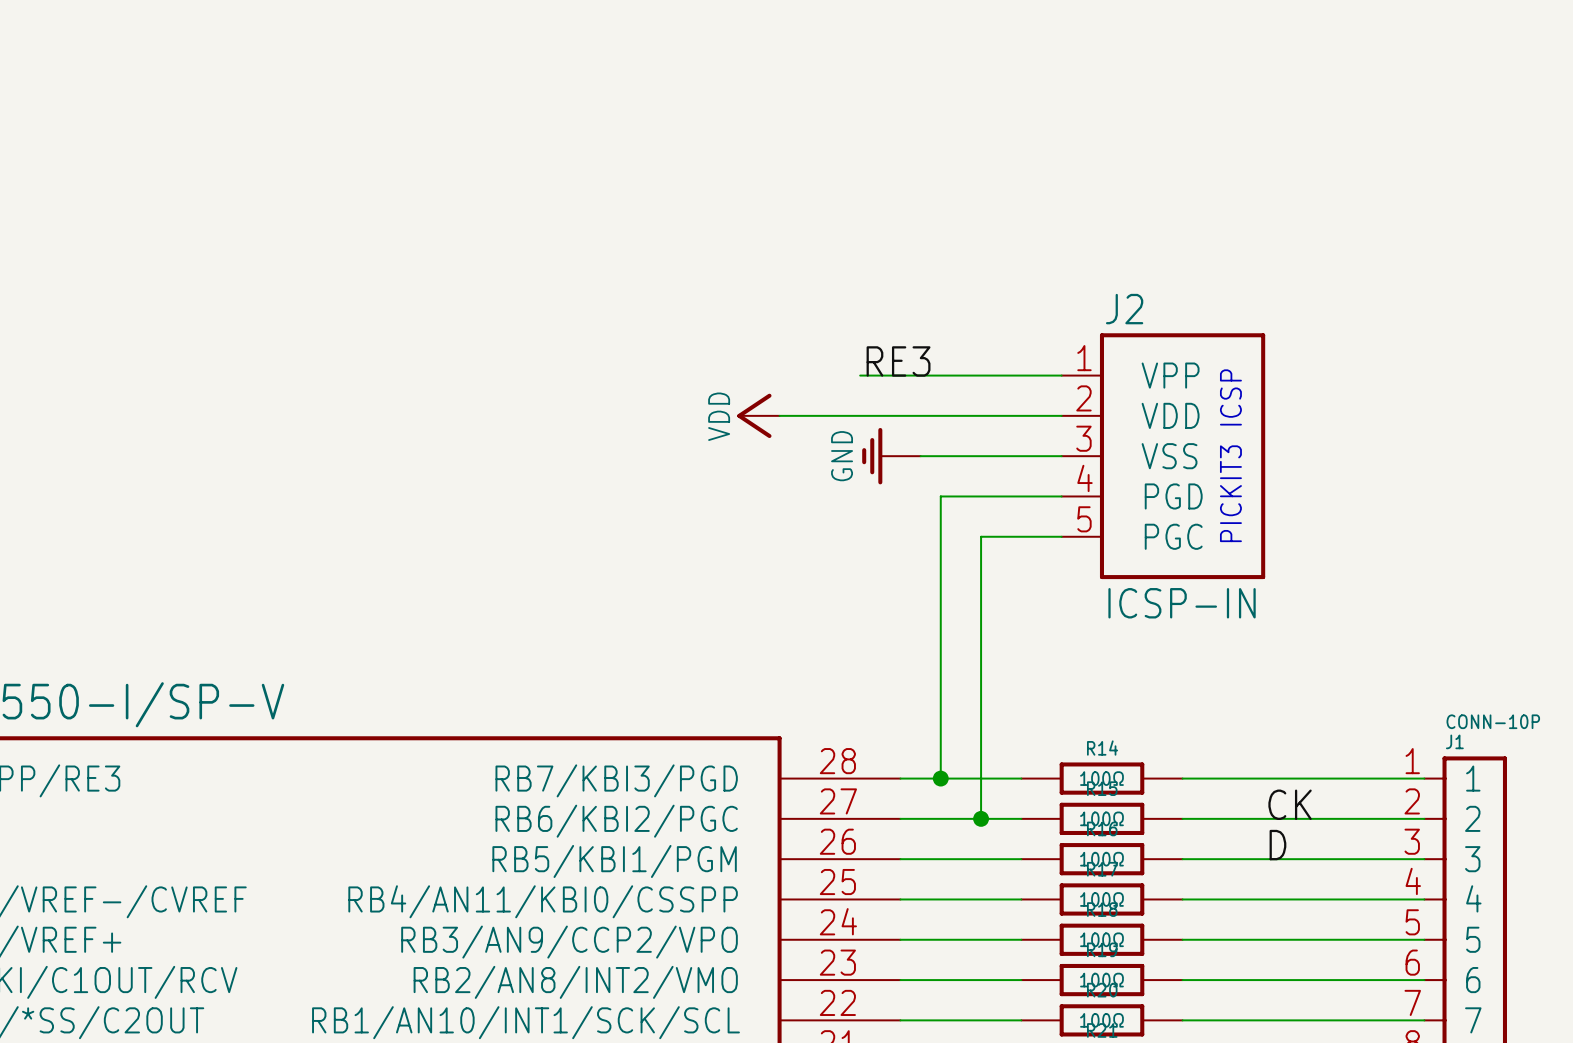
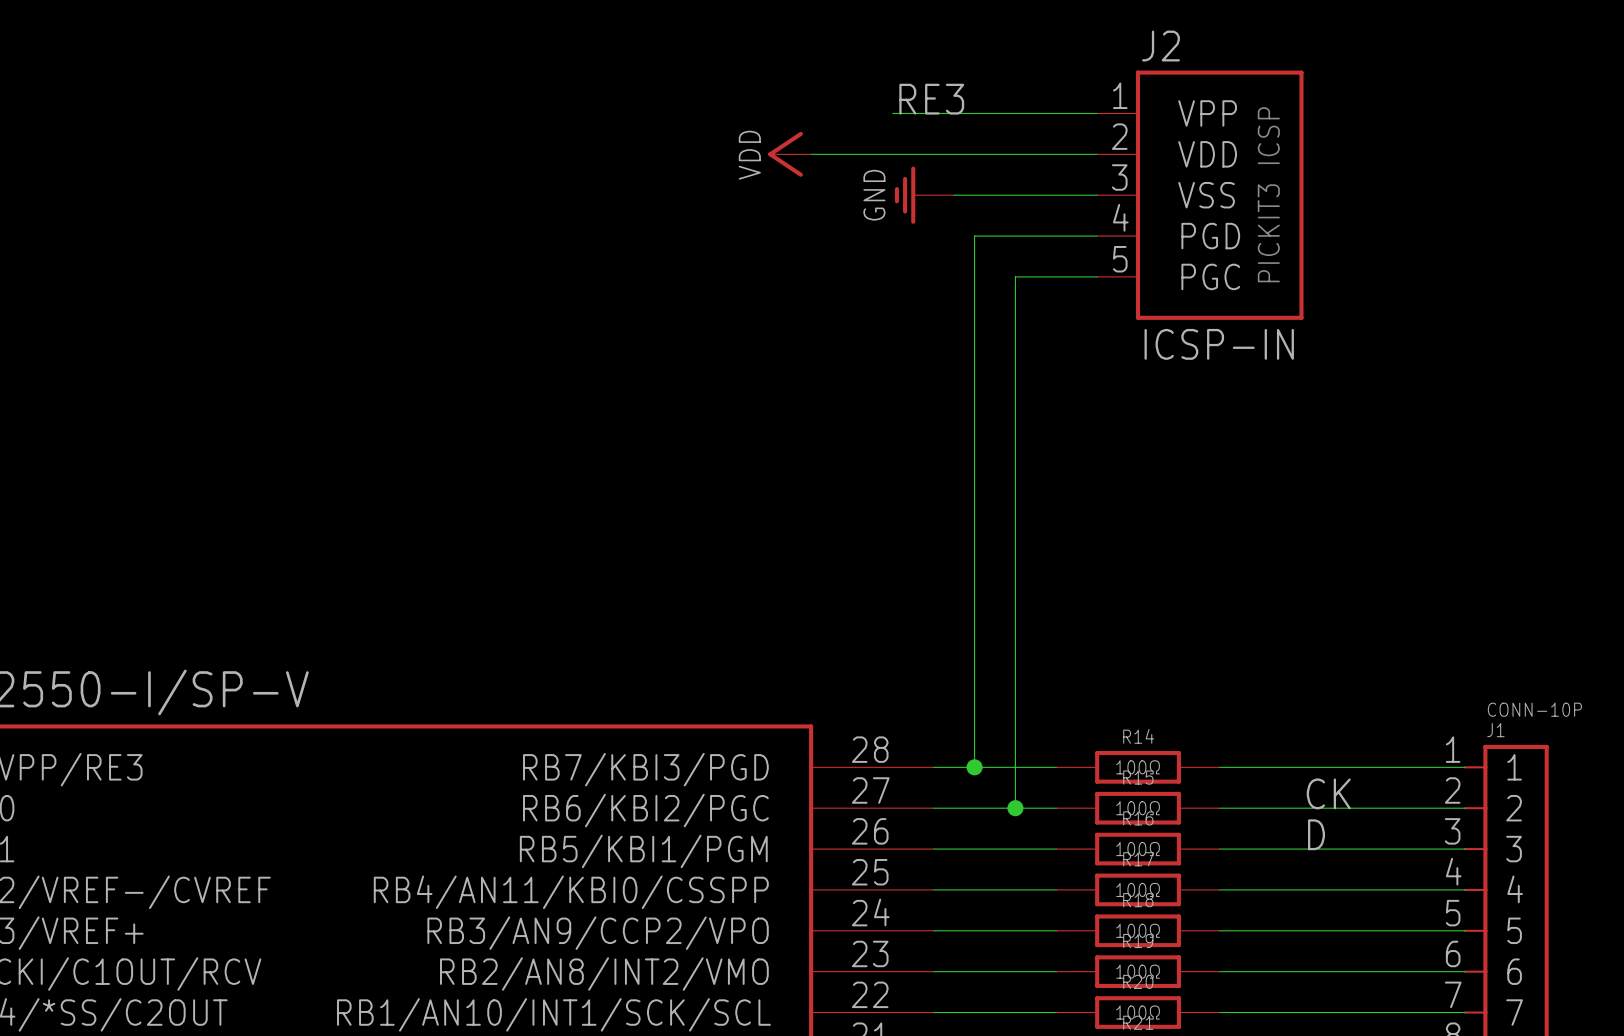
label position: RE3 (898, 361) -> RE3 (931, 99)
wire: (860, 375) (1061, 375) -> (892, 113) (1097, 113)
power symbol position: VDD (758, 415) -> VDD (789, 154)
wire: (779, 415) (1061, 415) -> (811, 154) (1097, 154)
power symbol position: GND (891, 456) -> GND (924, 195)
wire: (920, 456) (1061, 456) -> (954, 195) (1097, 195)
J2 position: (1163, 456) -> (1200, 195)
wire: (940, 496) (1061, 496) -> (974, 481) (974, 236) (1097, 236)
wire: (981, 536) (1061, 536) -> (1015, 522) (1015, 276) (1097, 276)

